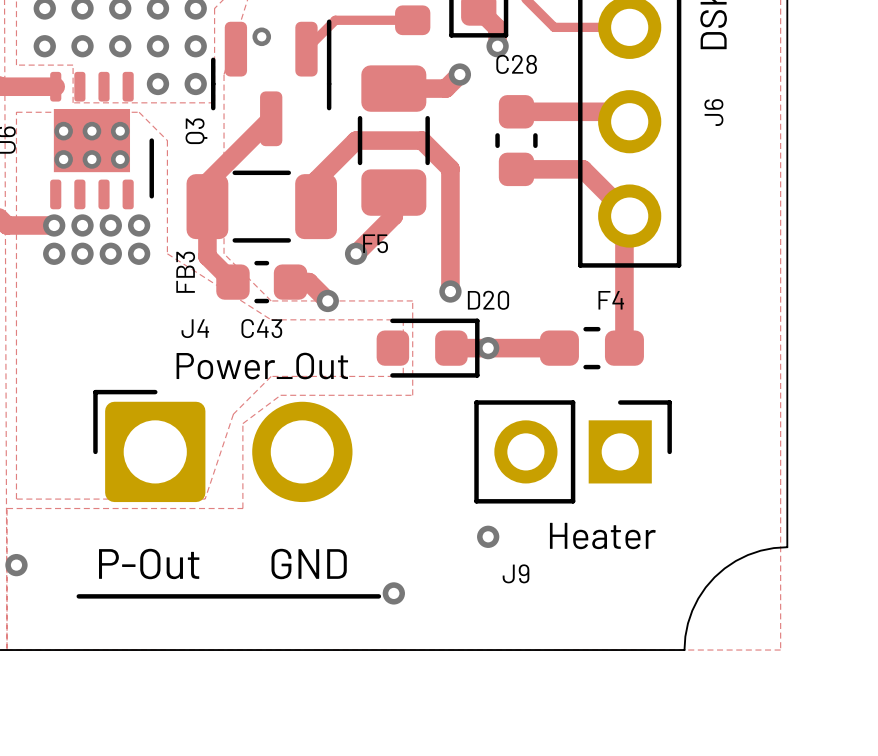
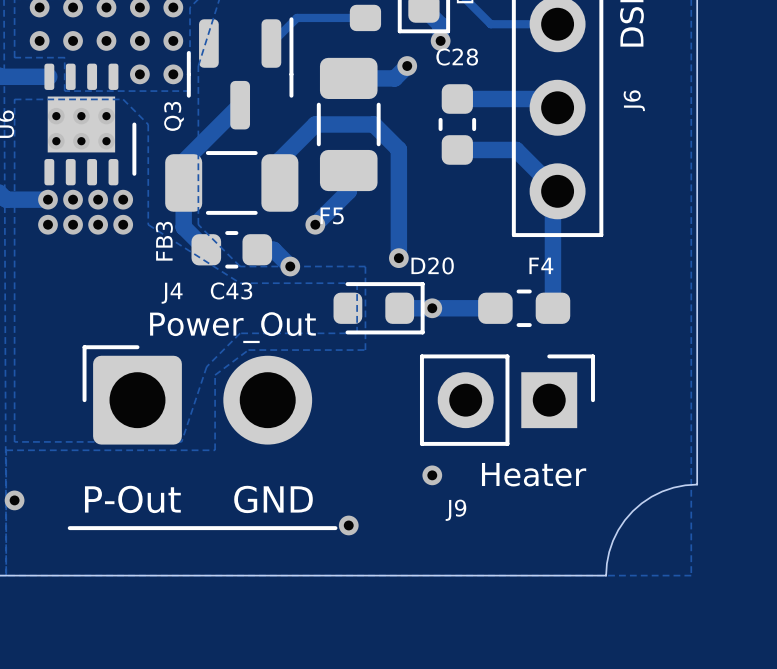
via: (261, 36) -> none

